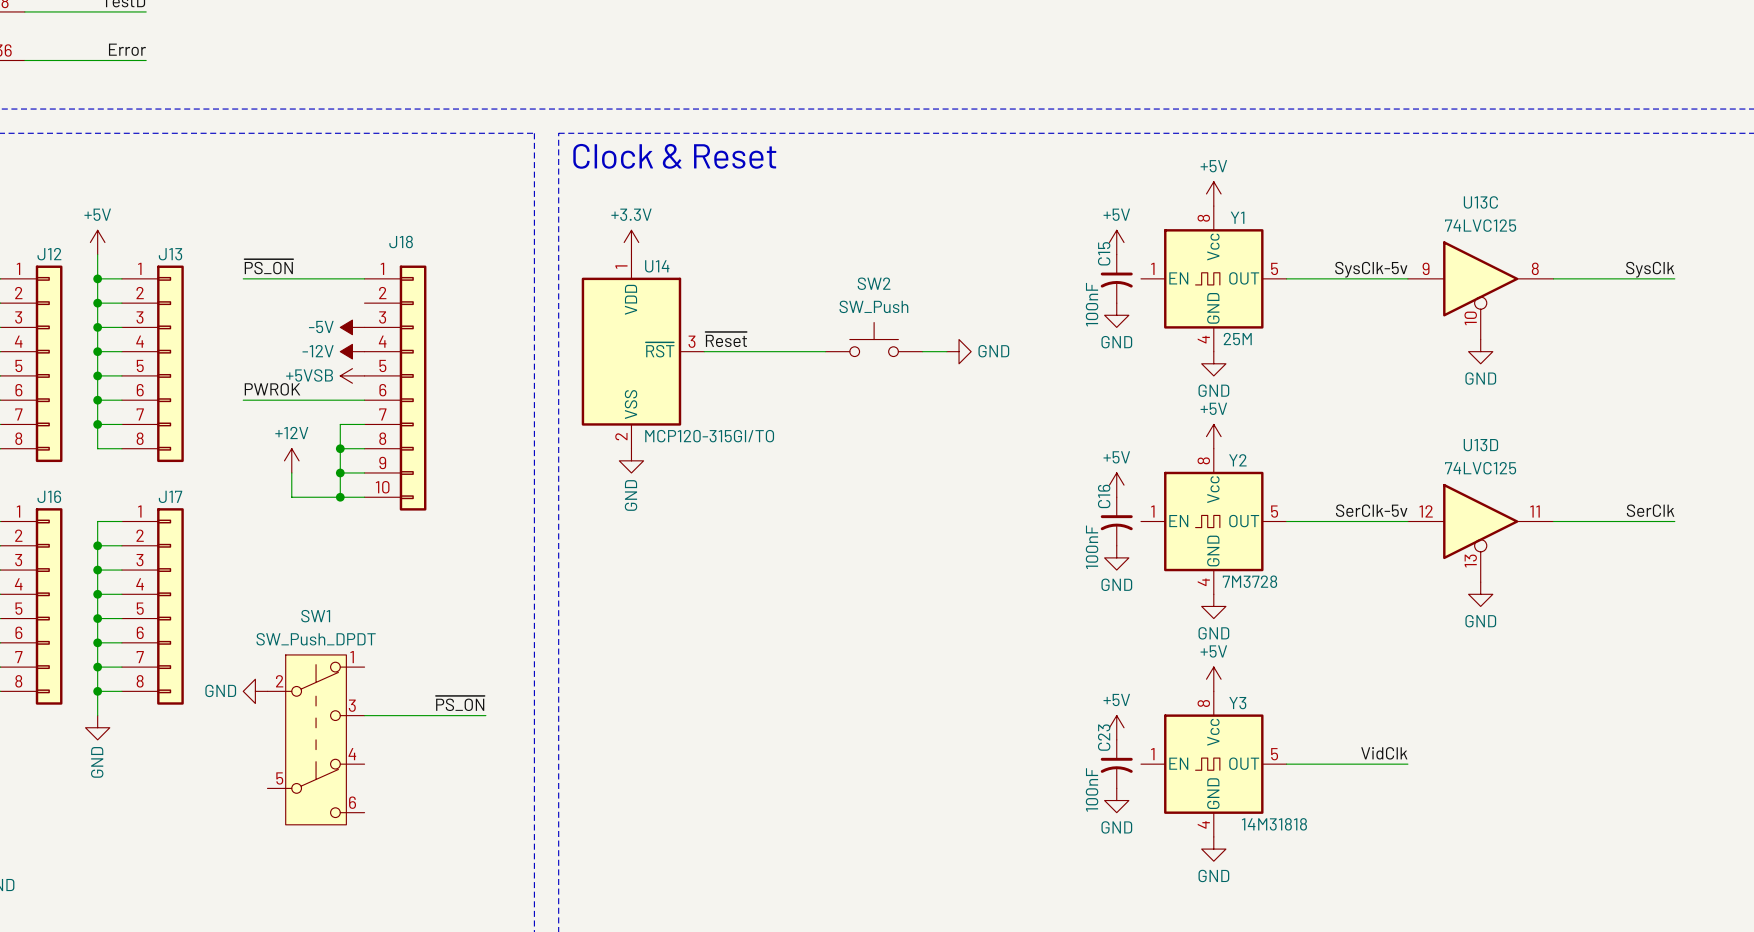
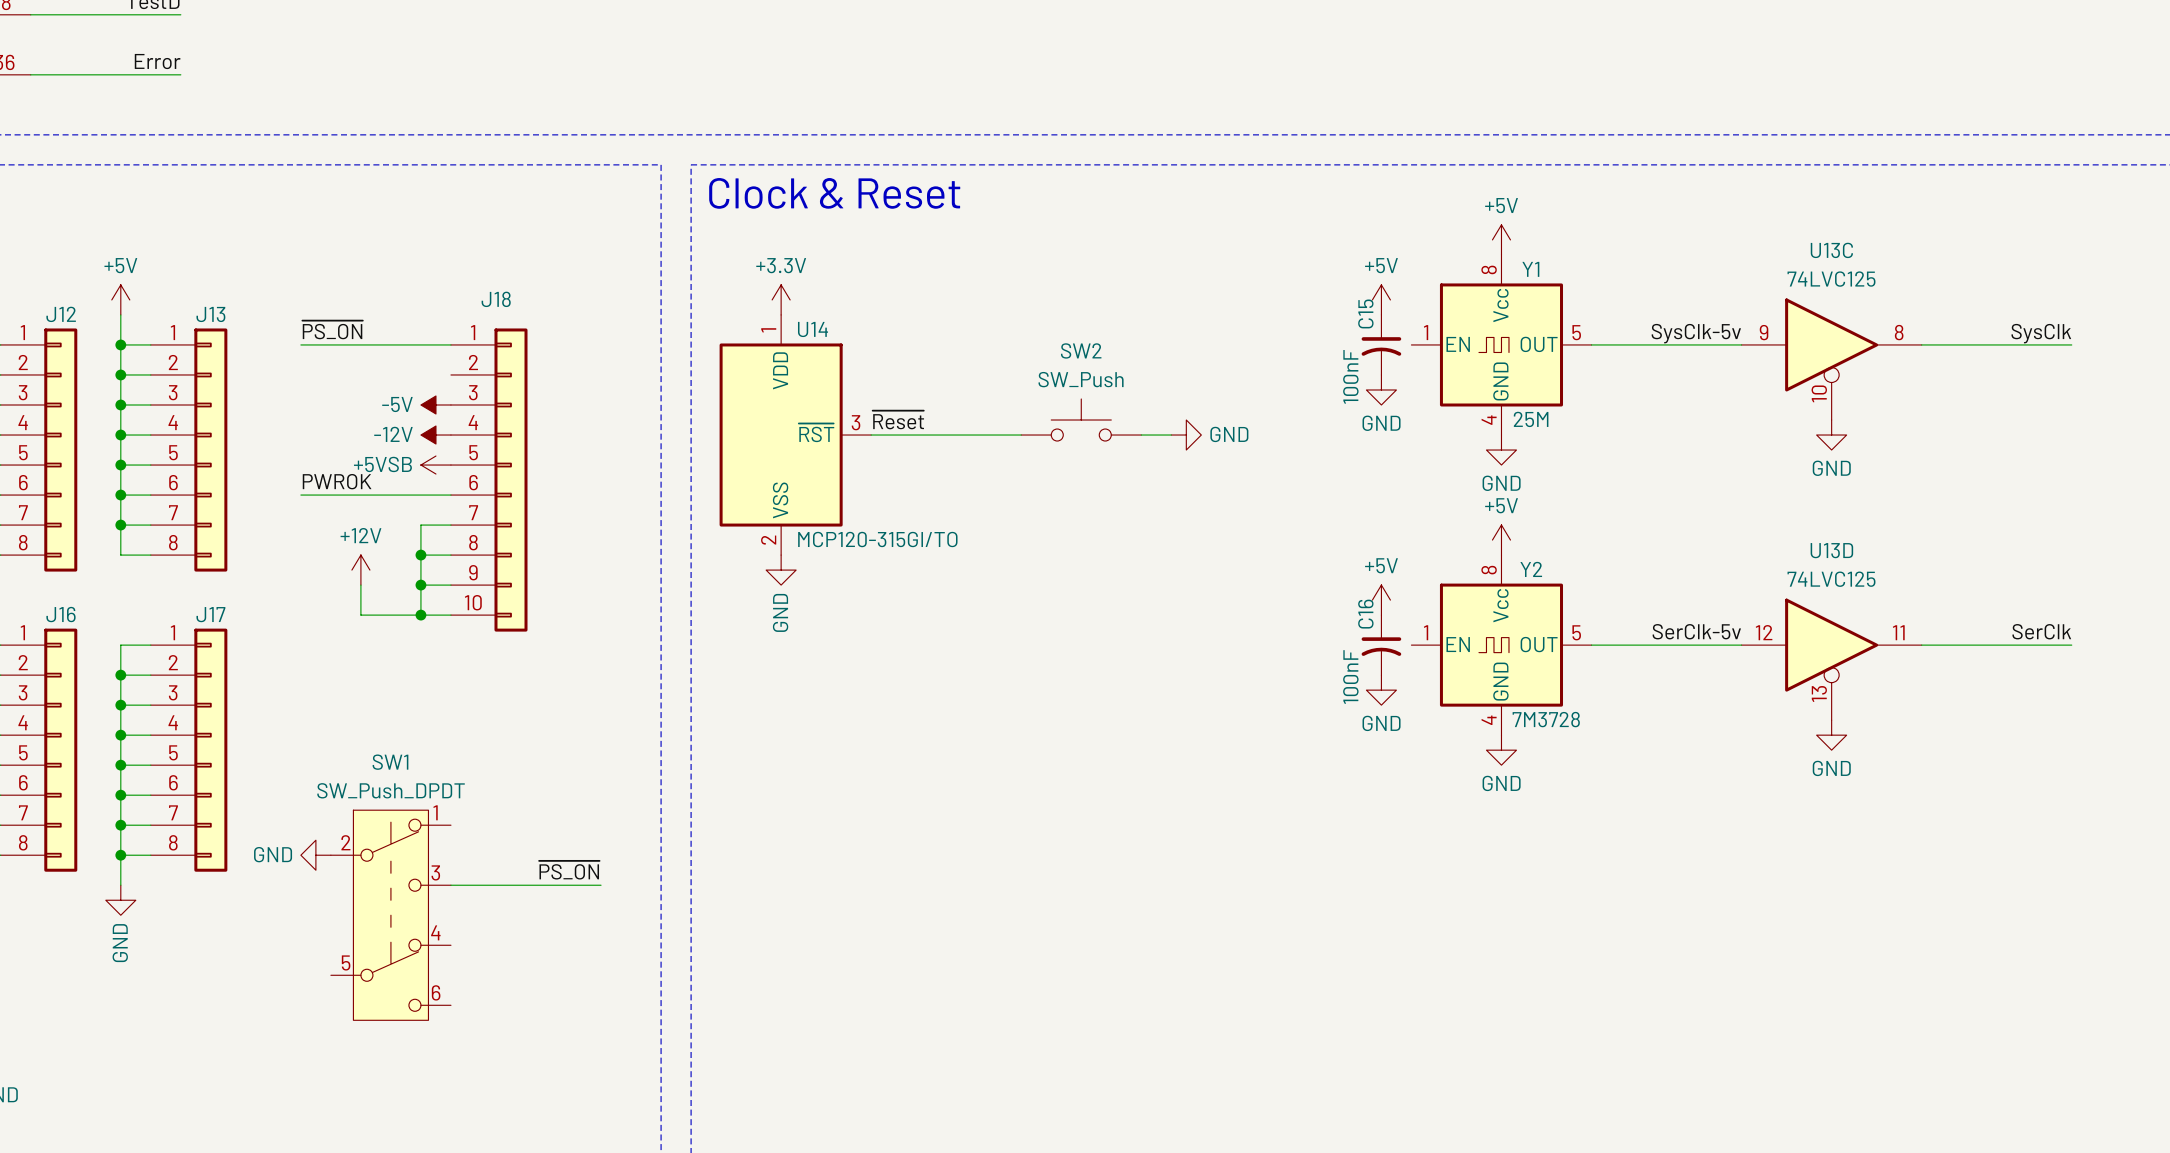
power symbol: +5V (1213, 679) -> none
power symbol: +5V (1116, 727) -> none
label: VidClk (1384, 753) -> none
C23: 100nF (1116, 764) -> none
Y3: 14M31818 (1213, 764) -> none
wire: (1286, 764) (1407, 764) -> none
power symbol: GND (1116, 800) -> none
power symbol: GND (1213, 849) -> none

